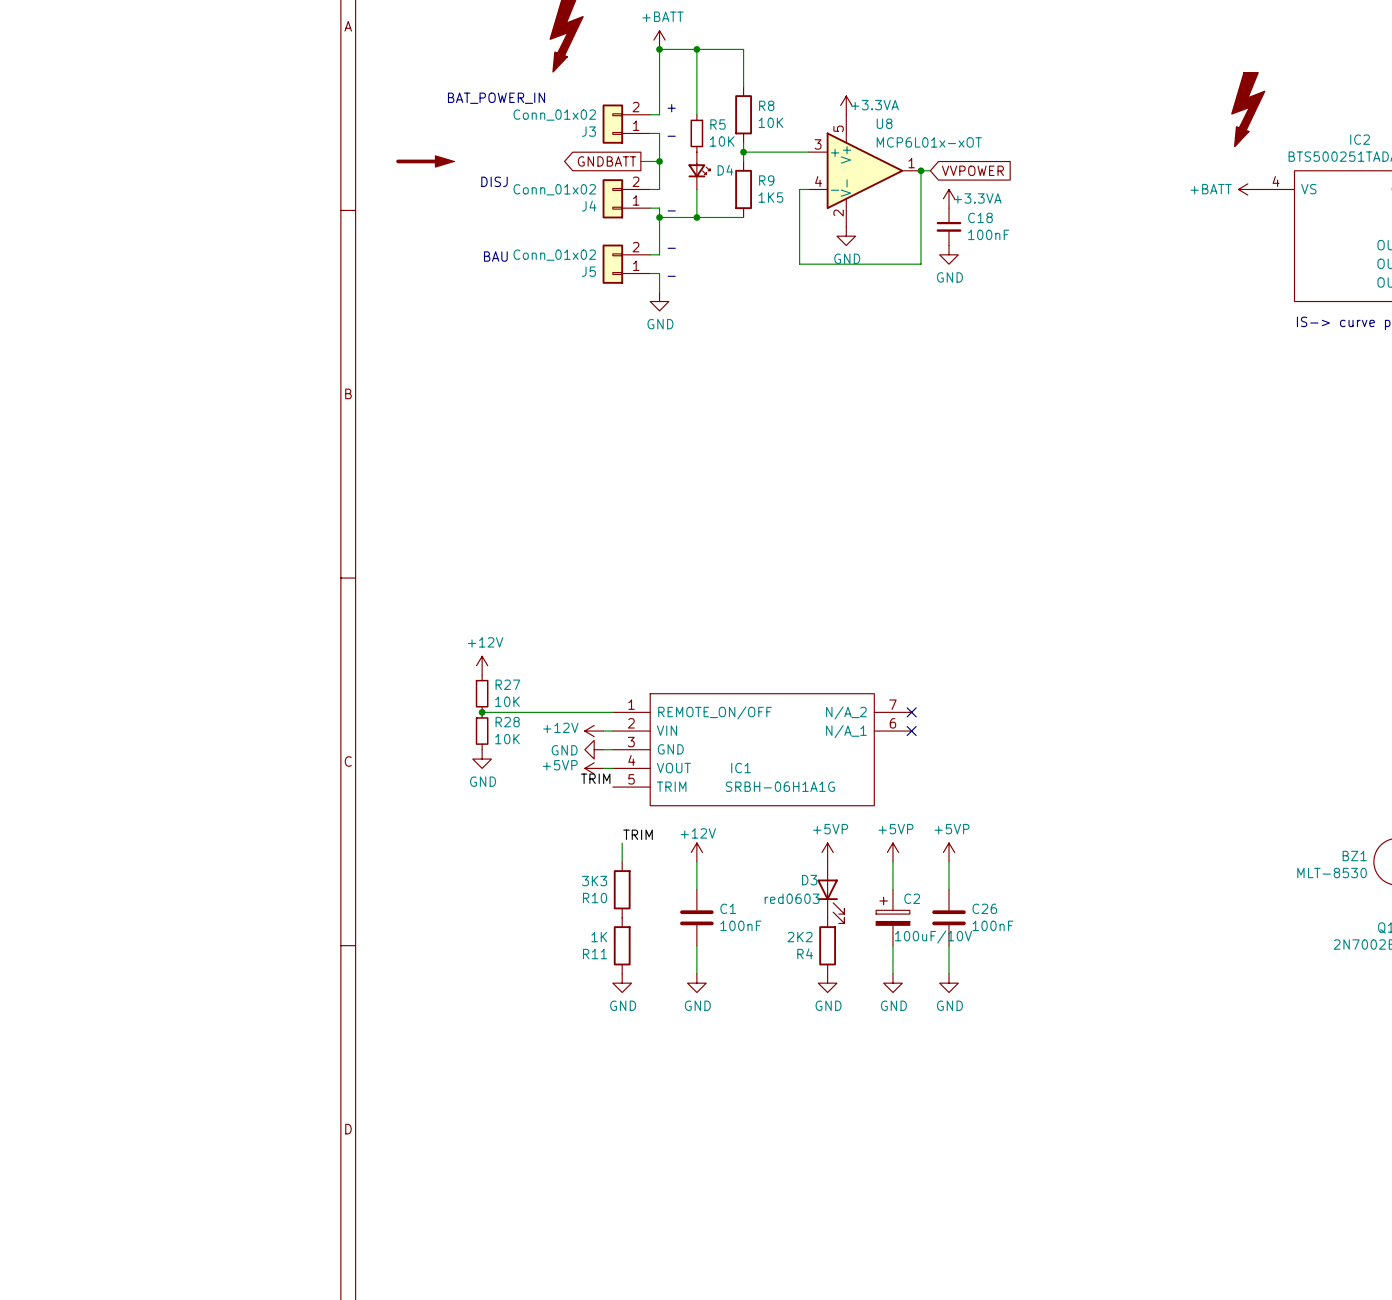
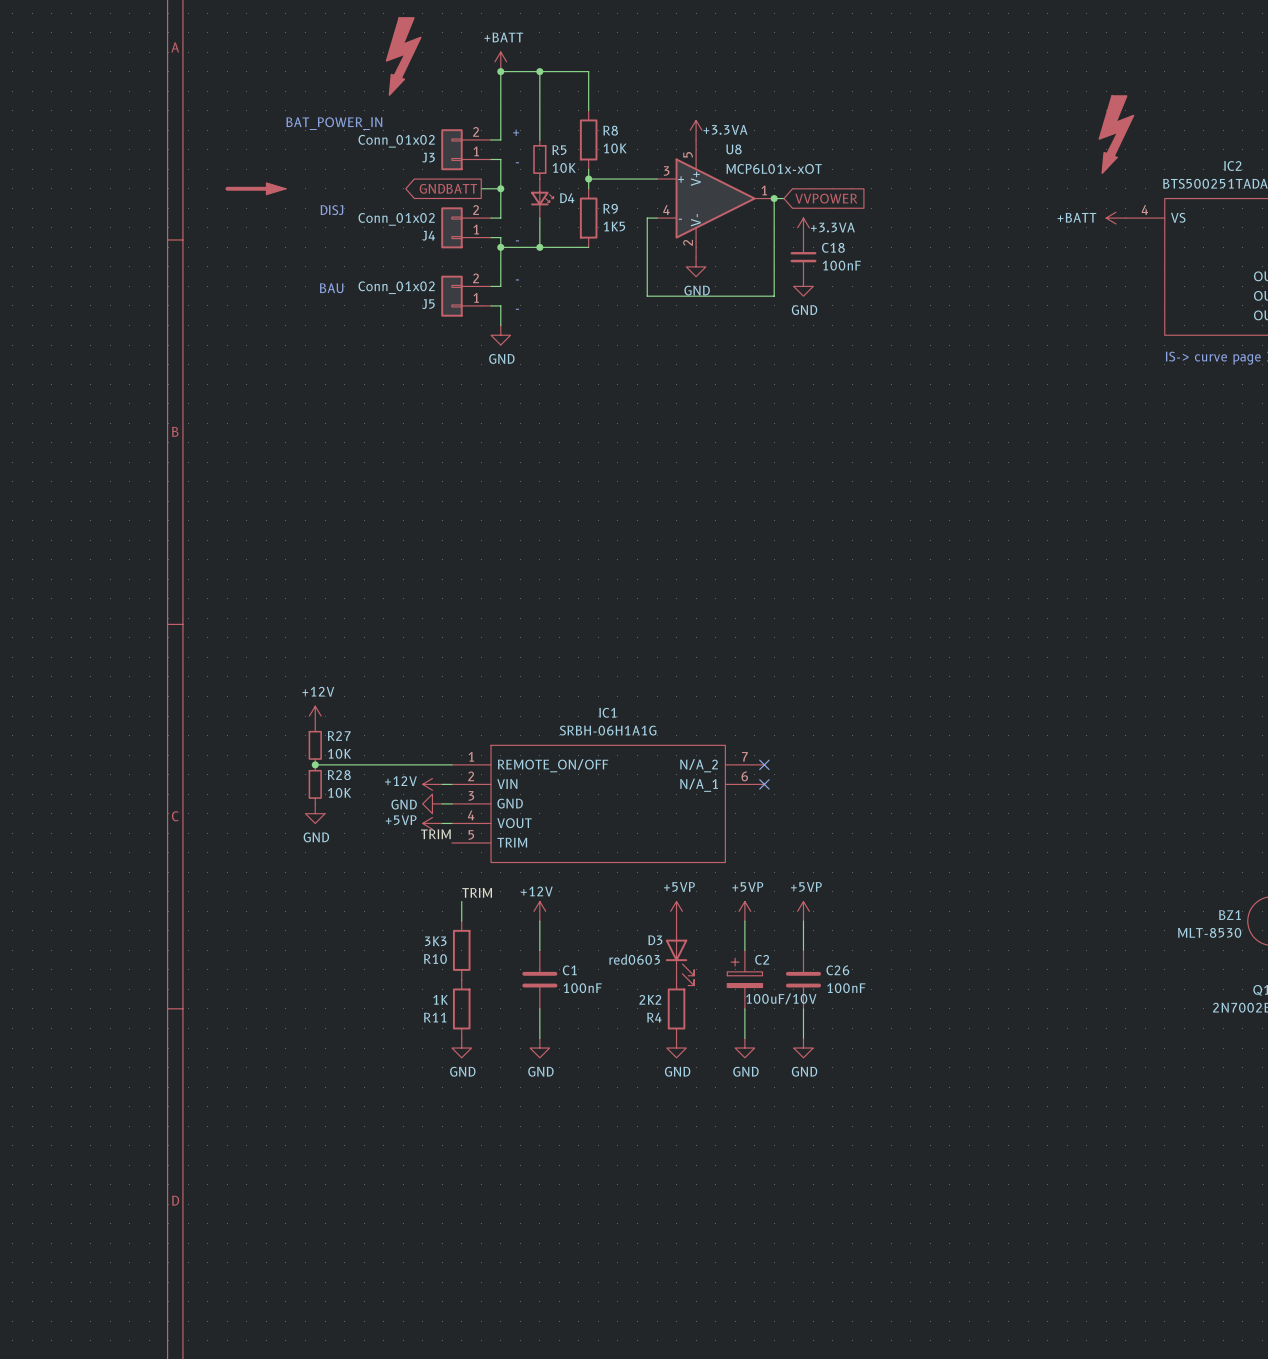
IC1 name position: IC1 (741, 768) -> IC1 (607, 712)
IC1 value position: SRBH-06H1A1G (780, 786) -> SRBH-06H1A1G (608, 730)

